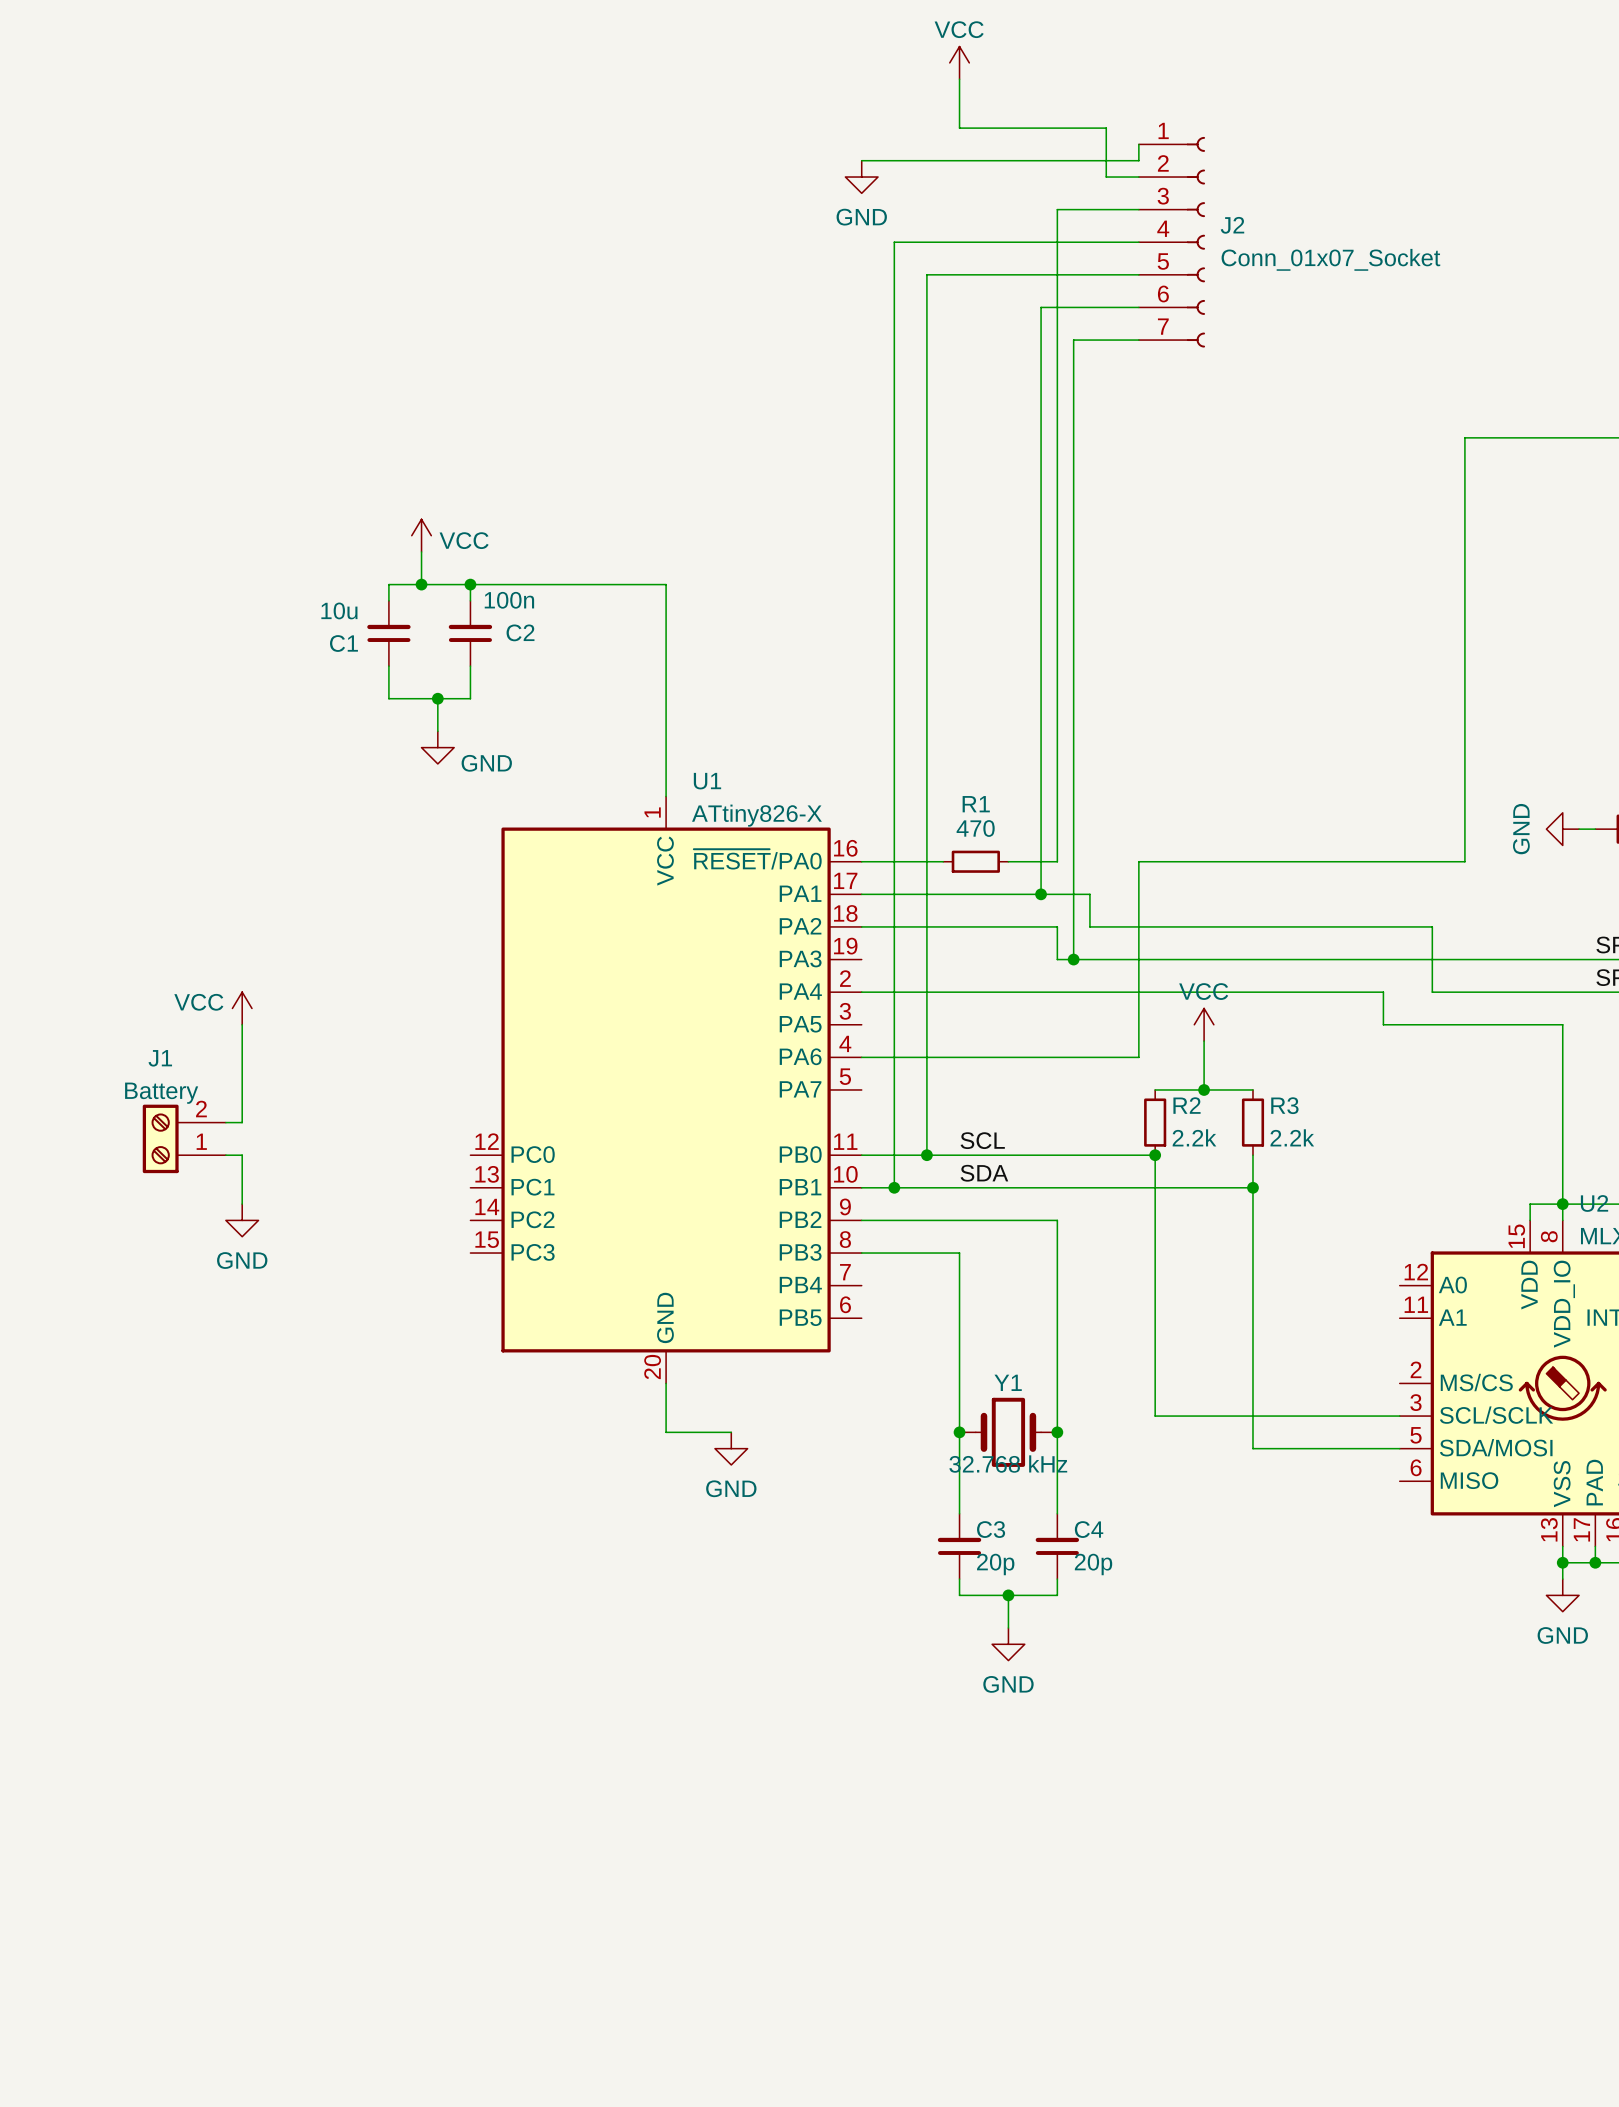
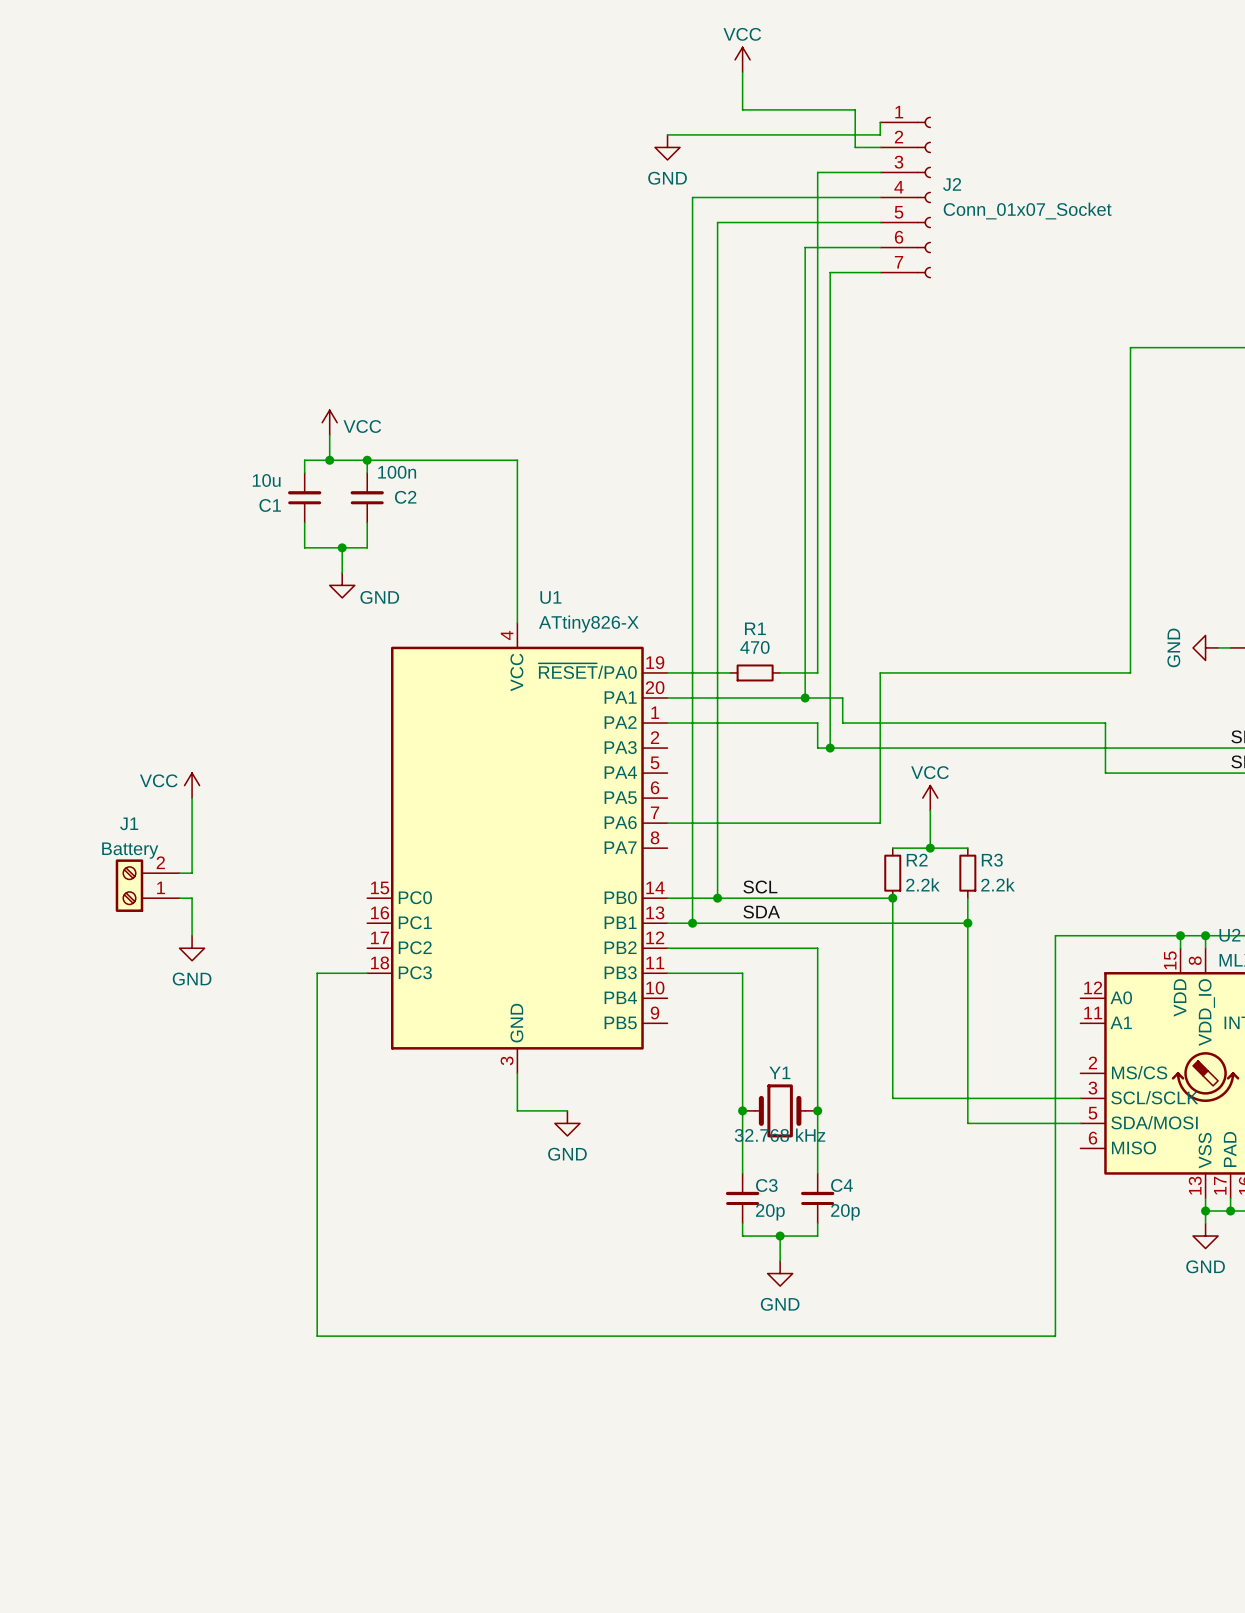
U1 symbol: [470, 796, 862, 1384] -> [367, 622, 668, 1074]
wire: (861, 992) (1383, 992) (1383, 1024) (1562, 1024) (1562, 1204) -> none
wire: none -> (1180, 935) (1055, 935) (1055, 1336) (317, 1336) (317, 973) (367, 973)
junction: none -> (1180, 935)

